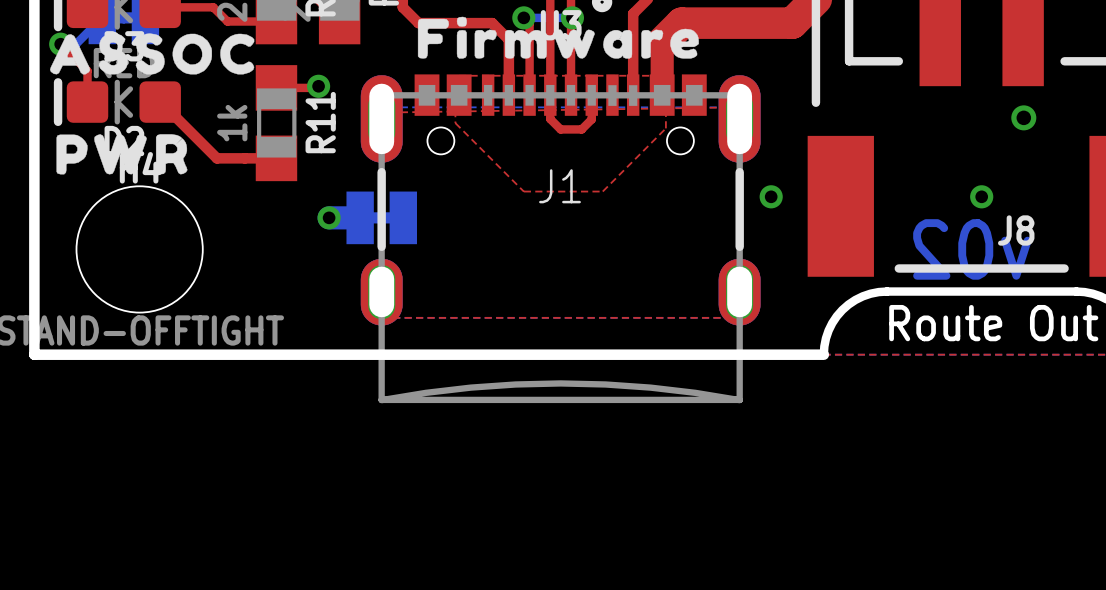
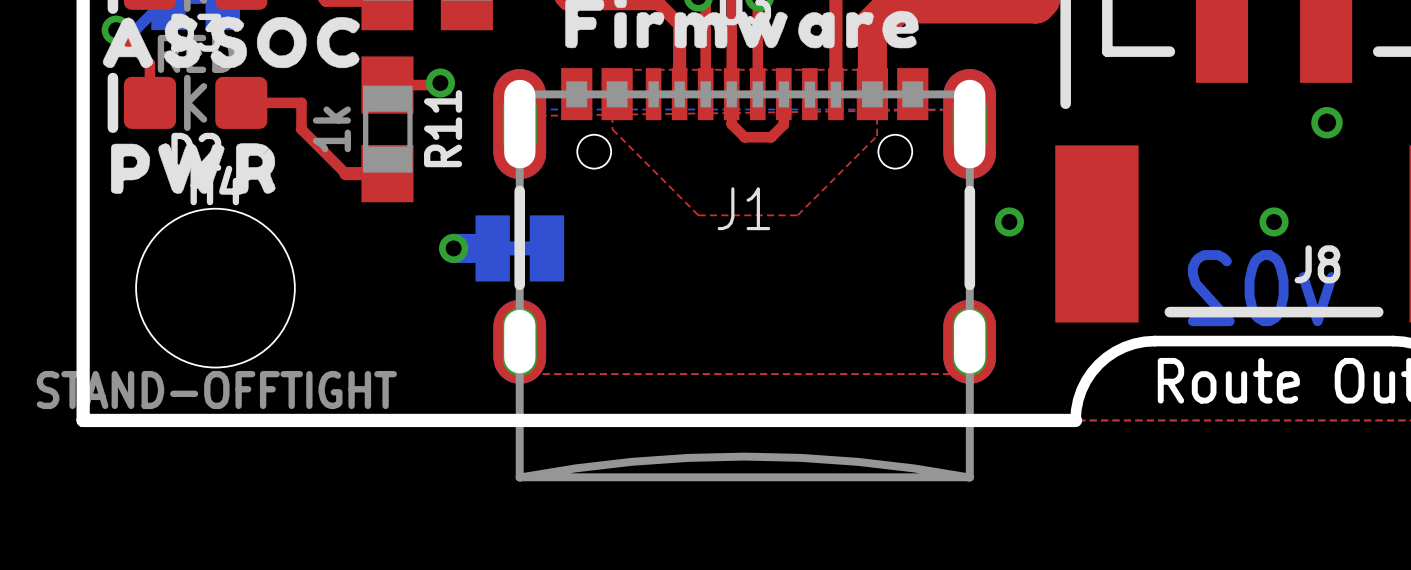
top track: (165, 102) (165, 107) (216, 158) (243, 158) -> (248, 102) (301, 102) (301, 129) (345, 173)

